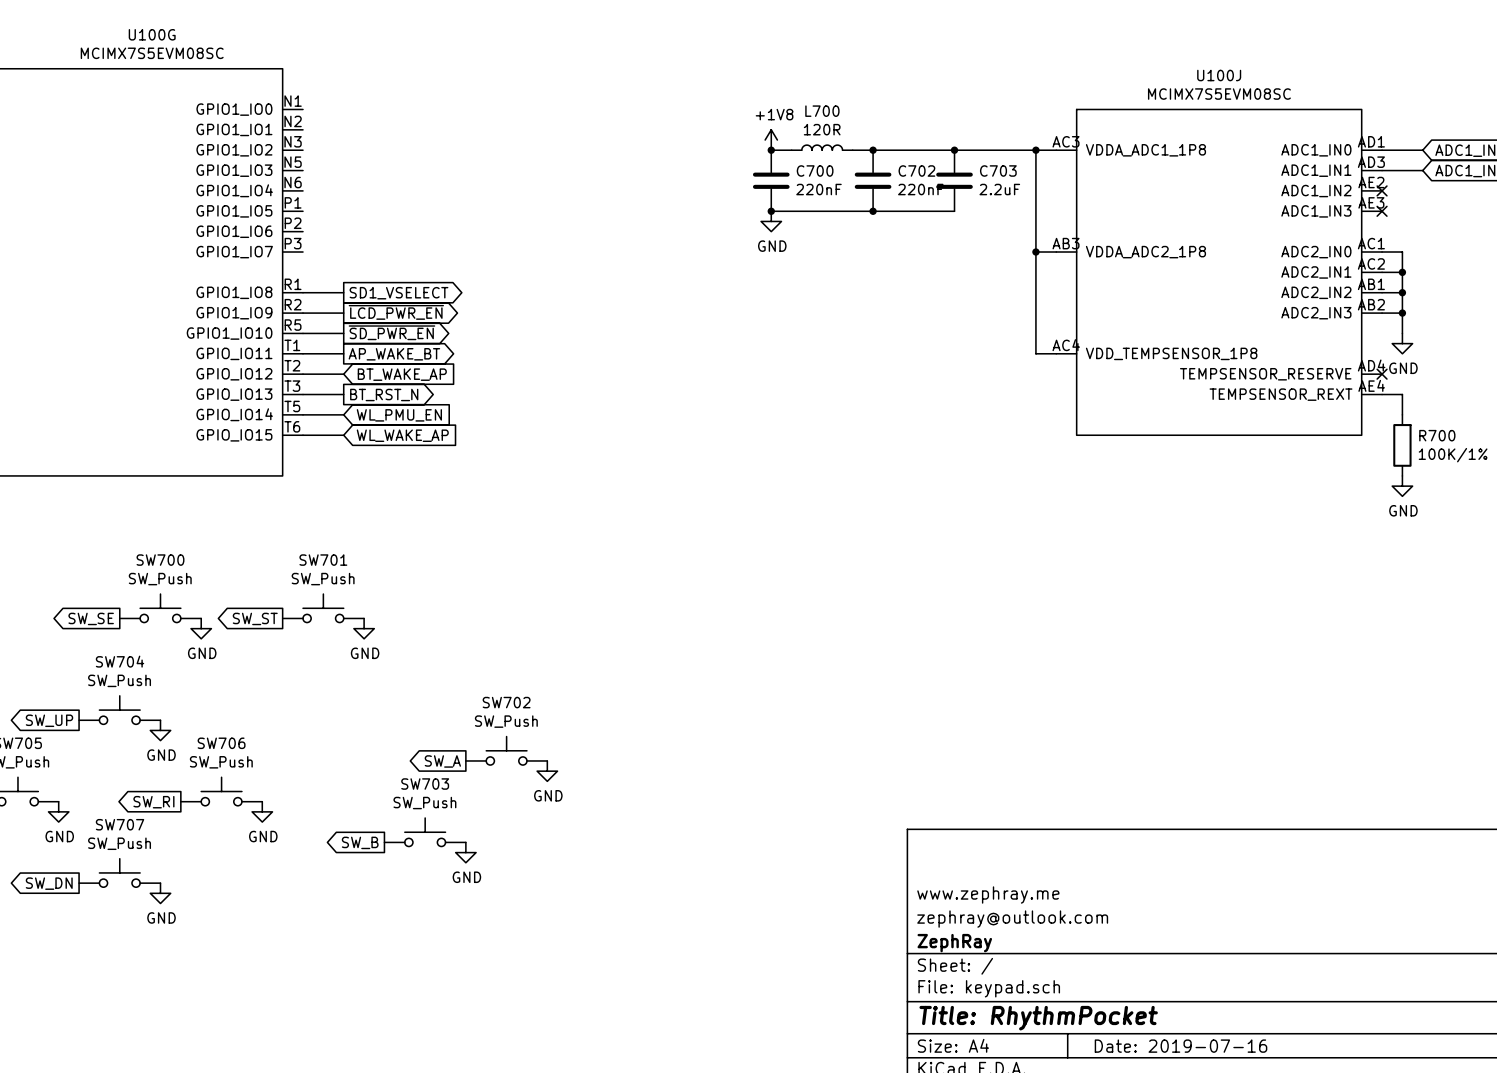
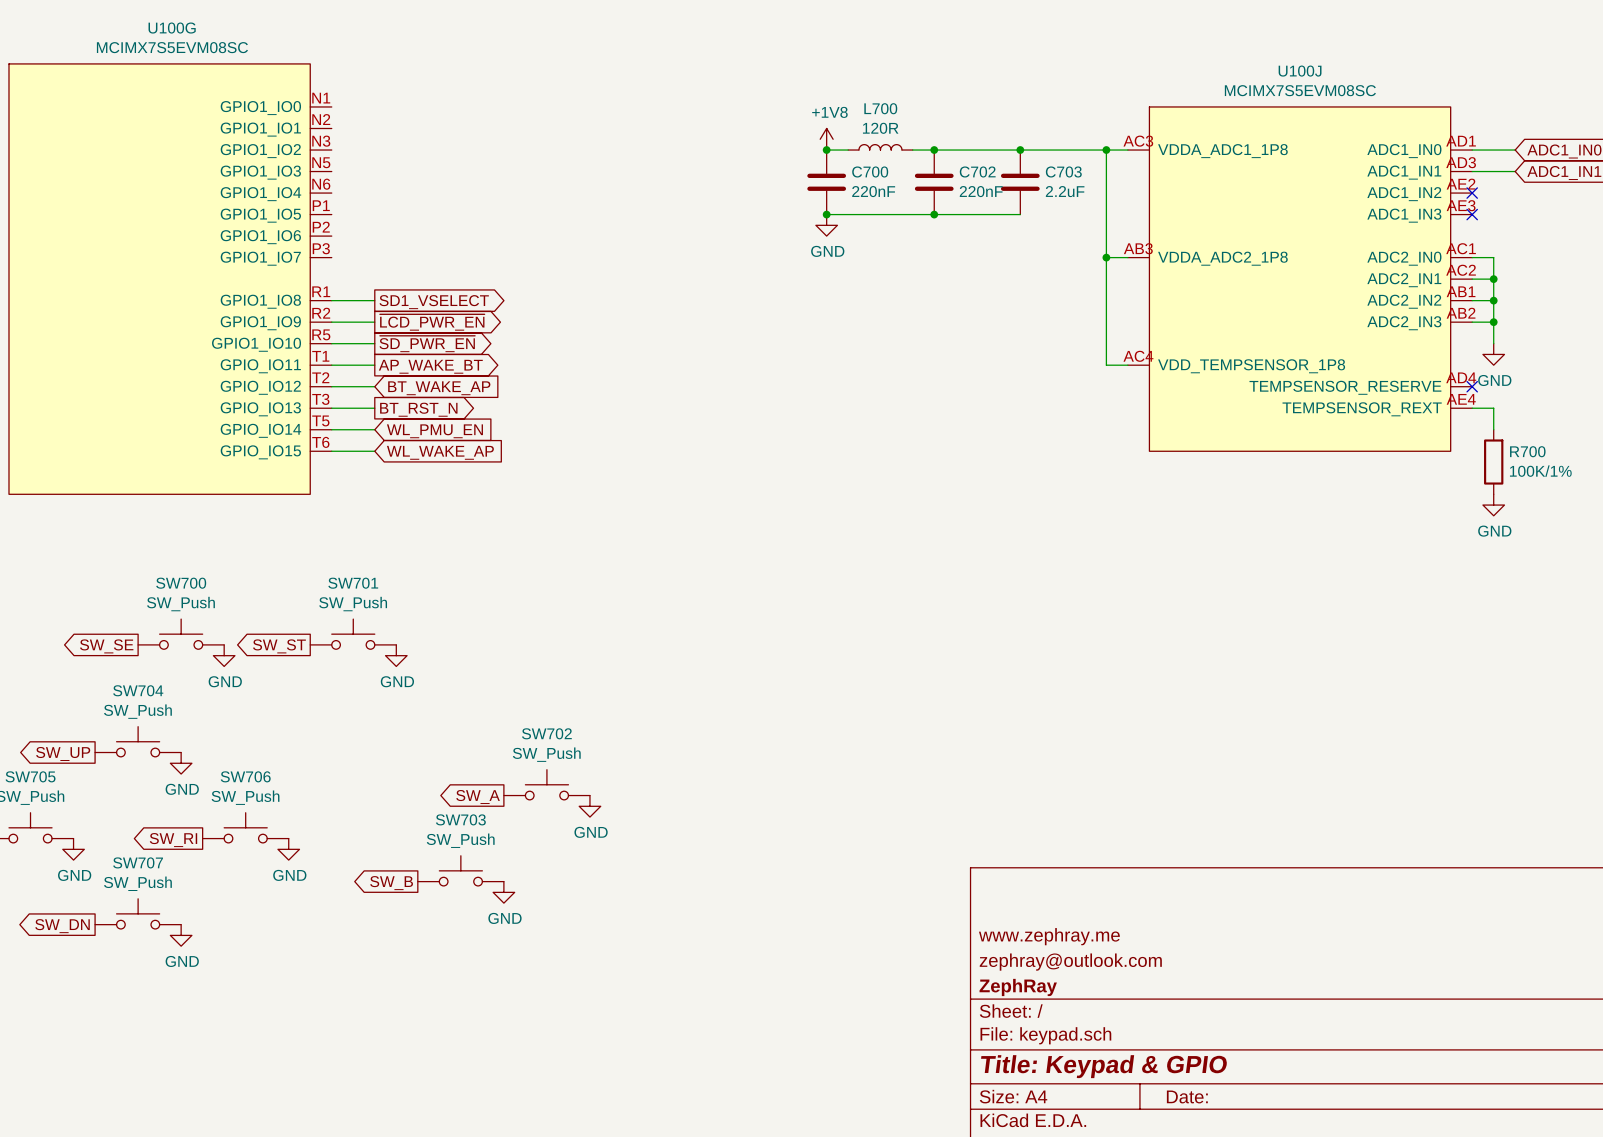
title block: Title: RhythmPocket (1038, 1018) -> Title: Keypad & GPIO (1104, 1066)
title block: Date: 2019-07-16 (1181, 1046) -> Date: (1187, 1096)

